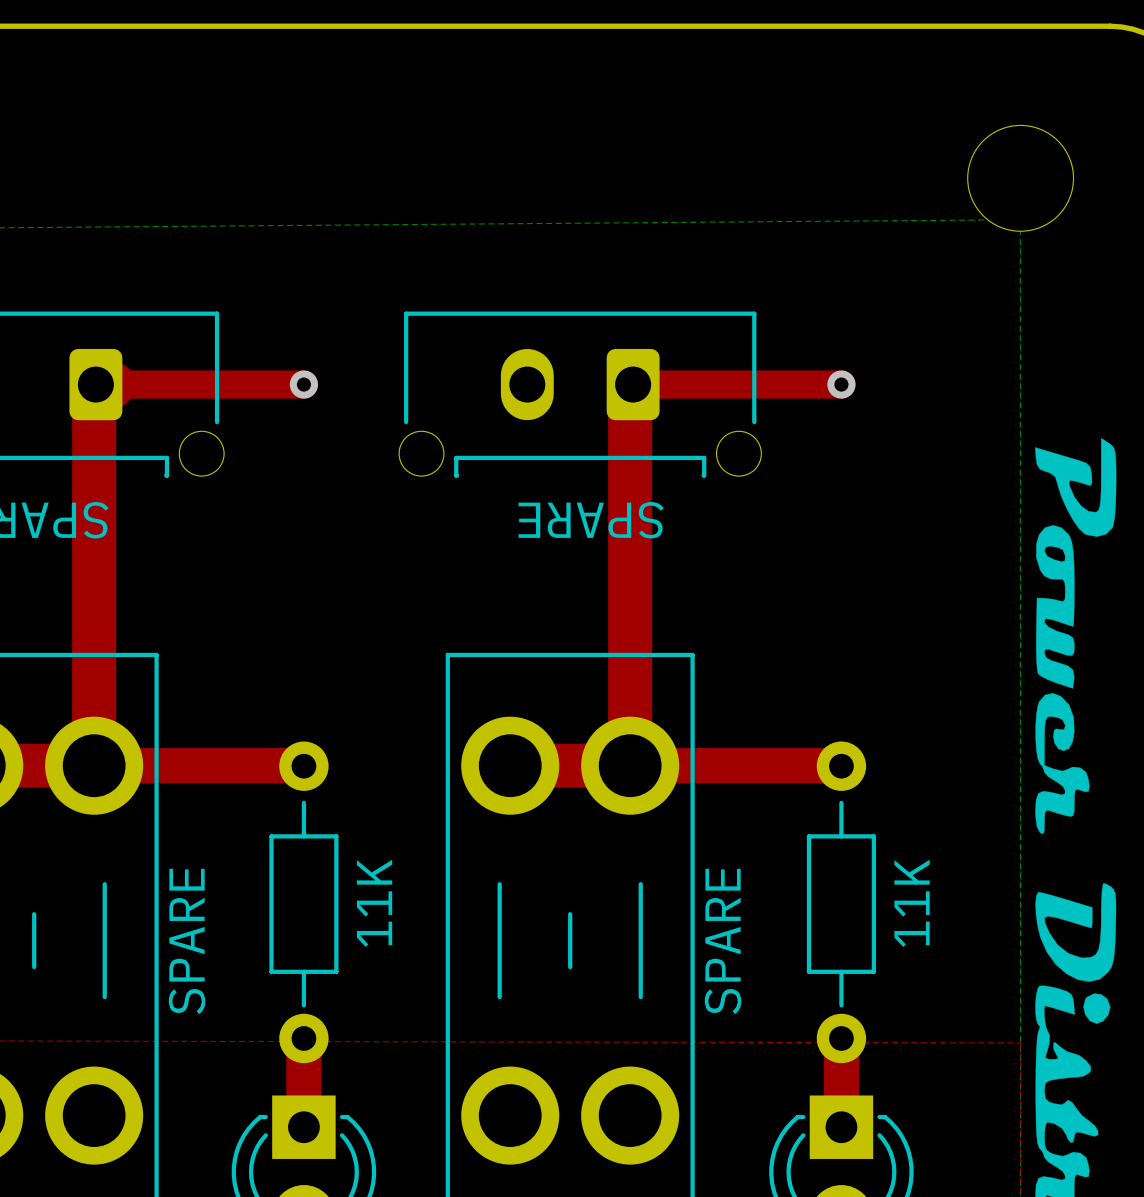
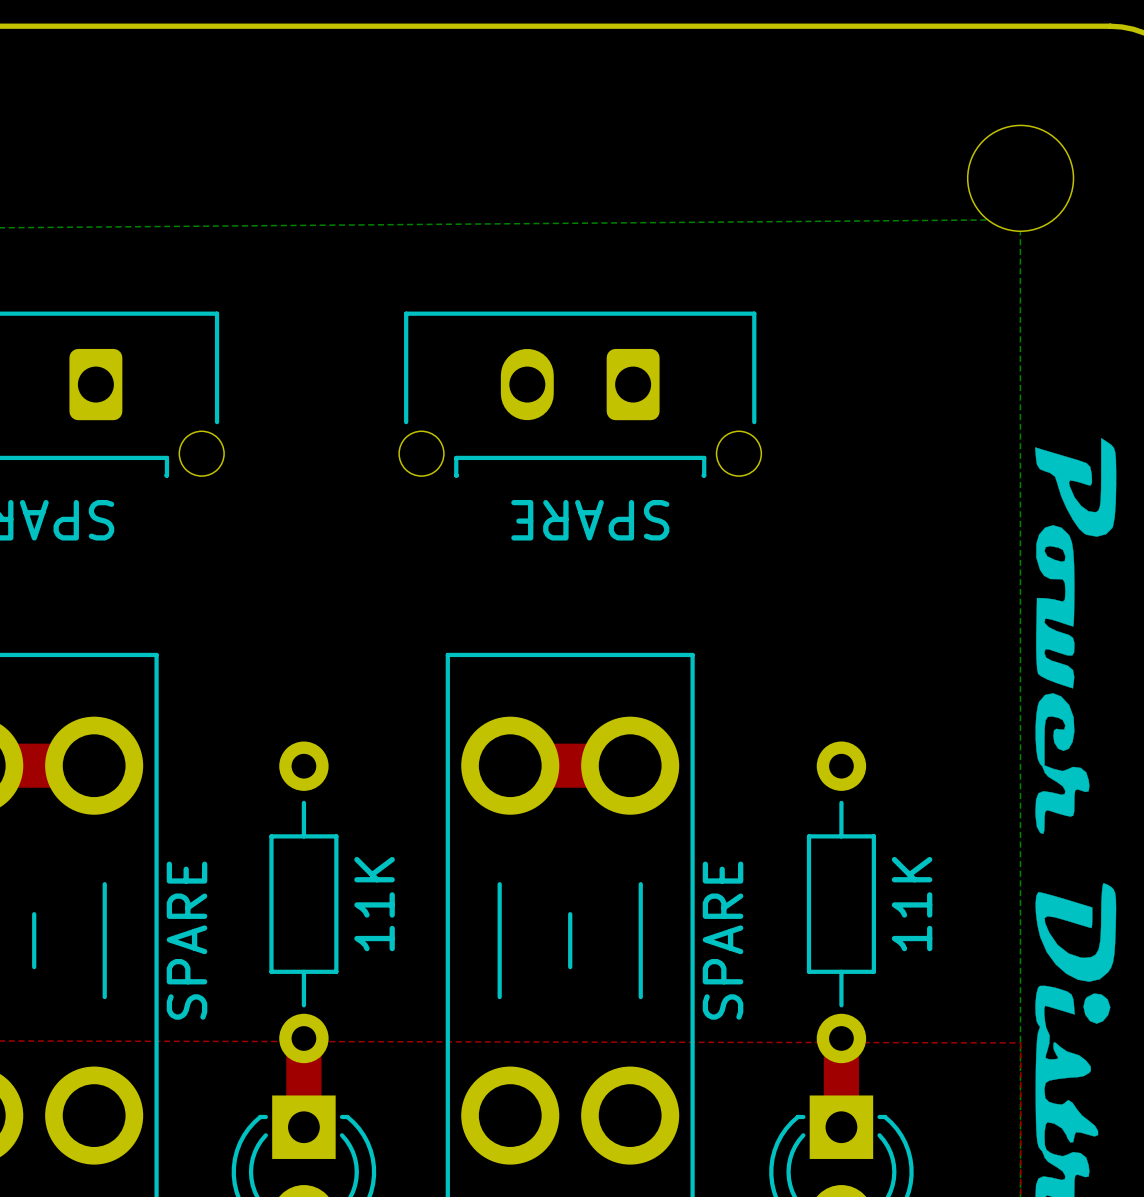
top track: (95, 384) (94, 386) (94, 765) (303, 765) -> none
top track: (303, 384) (113, 384) (110, 388) -> none
via: (303, 384) -> none
top track: (841, 384) (633, 384) (630, 387) (630, 765) (840, 765) -> none
via: (841, 384) -> none

